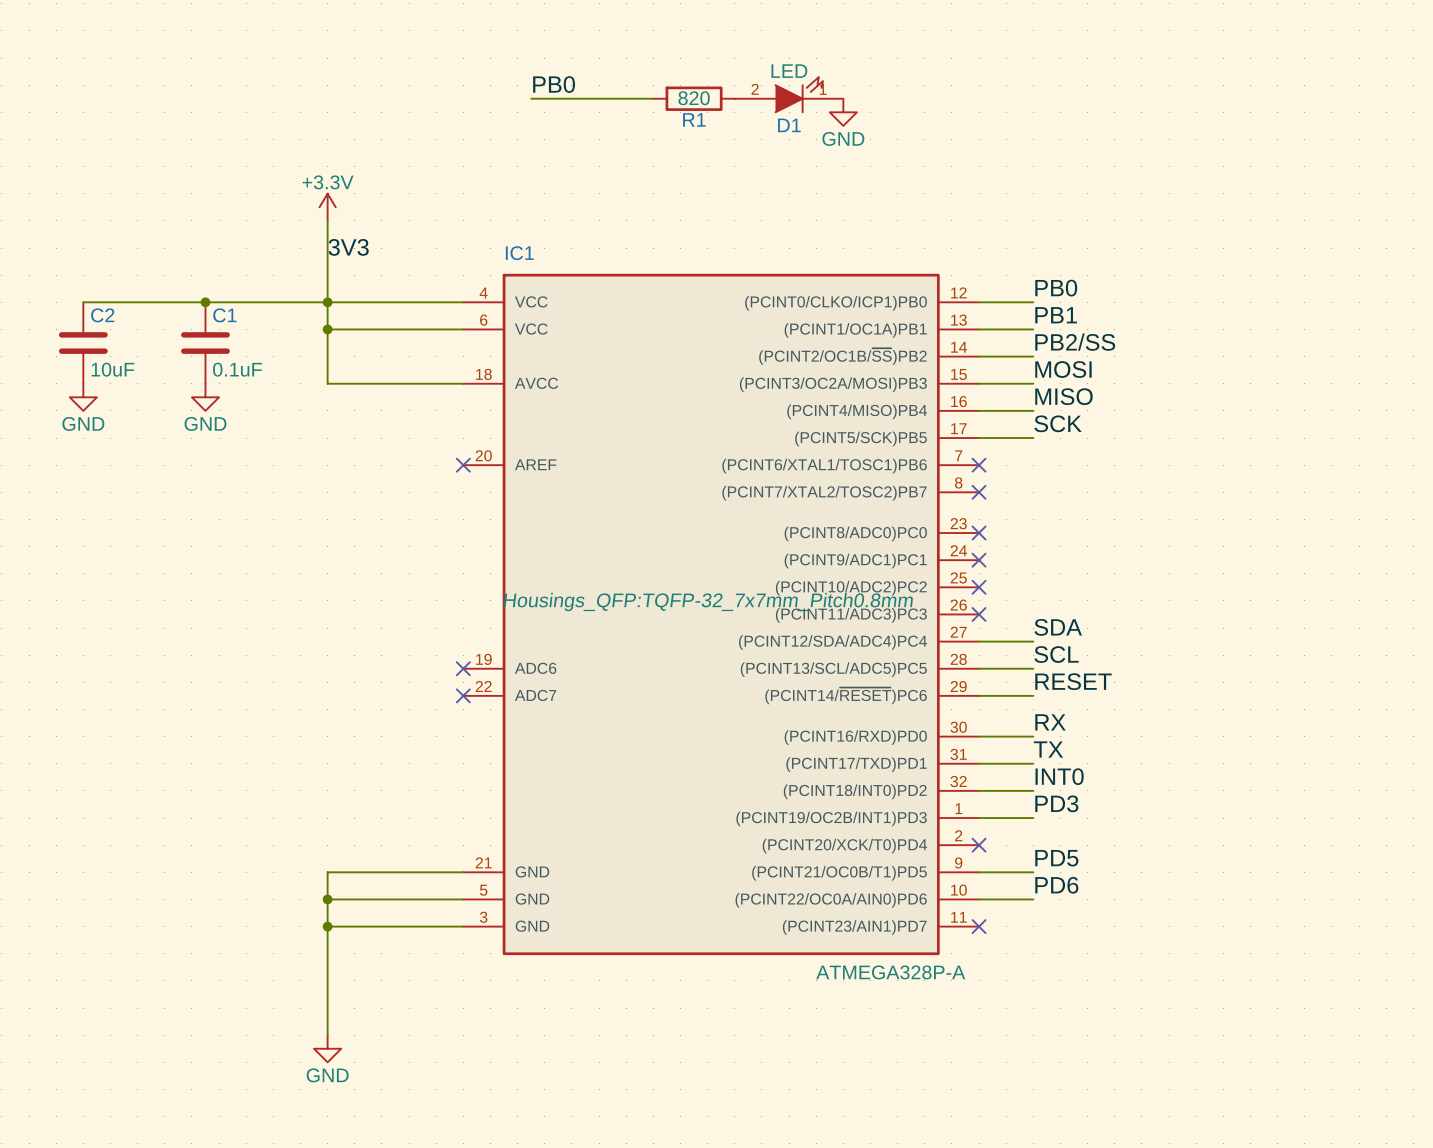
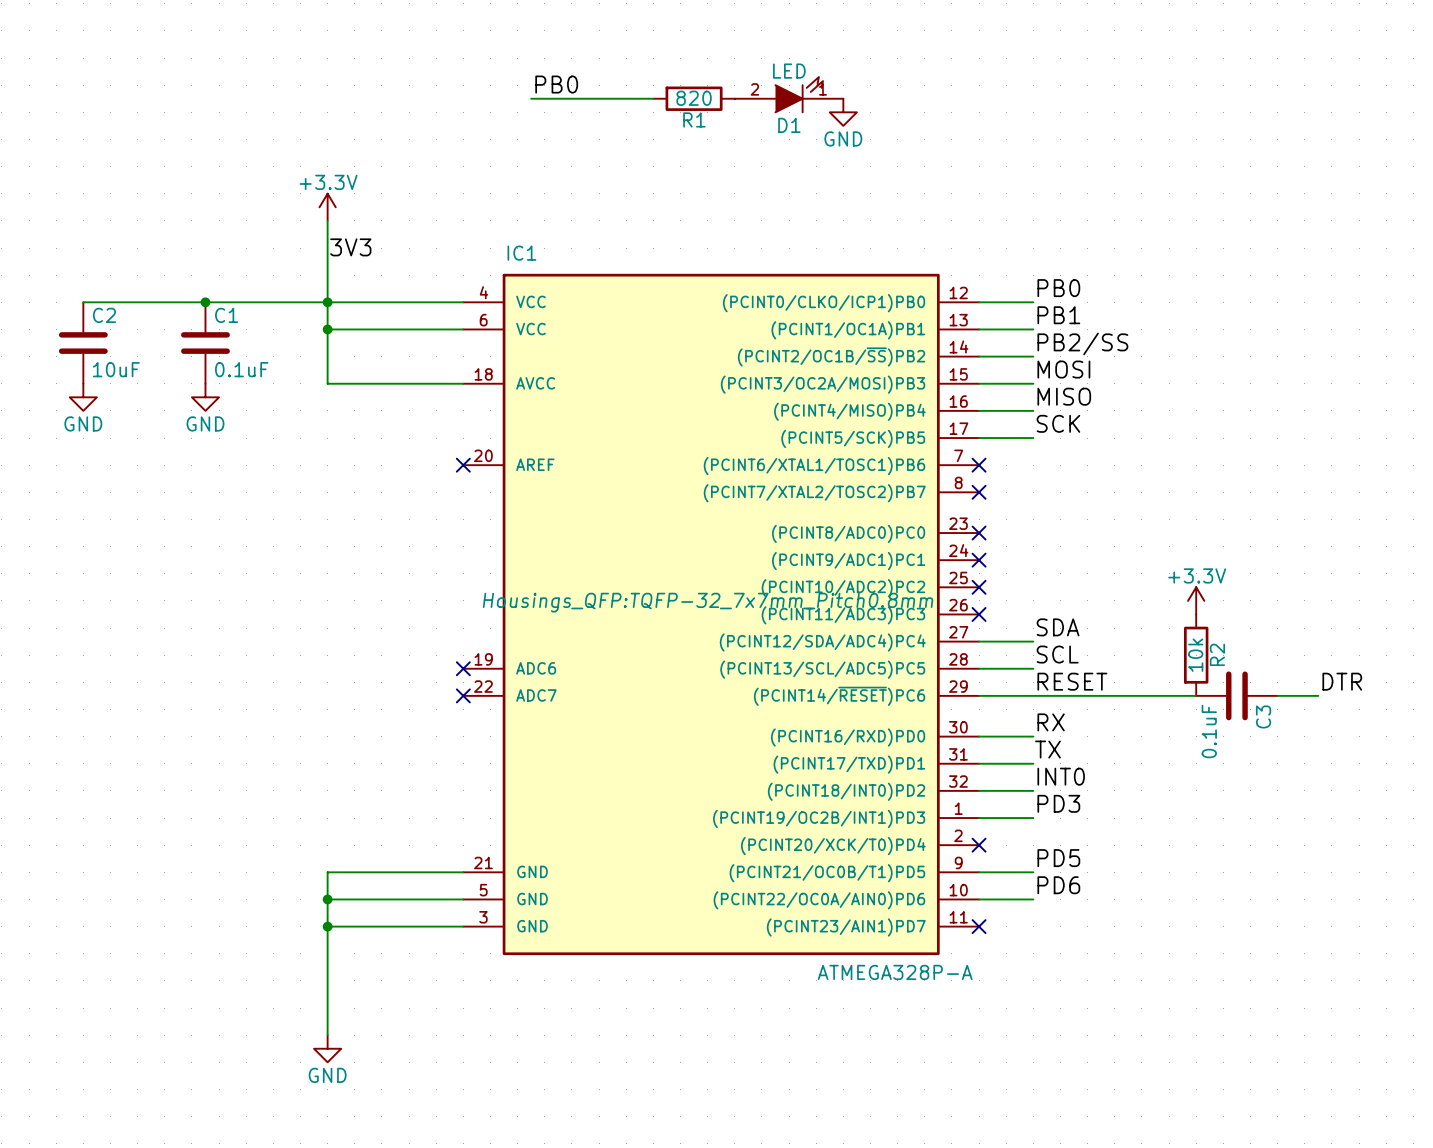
power symbol: none -> +3.3V (1196, 600)
R2: none -> 10k (1196, 655)
label: none -> DTR (1342, 681)
wire: none -> (1033, 695) (1196, 695)
C3: none -> 0.1uF (1236, 695)
wire: none -> (1277, 695) (1318, 695)

